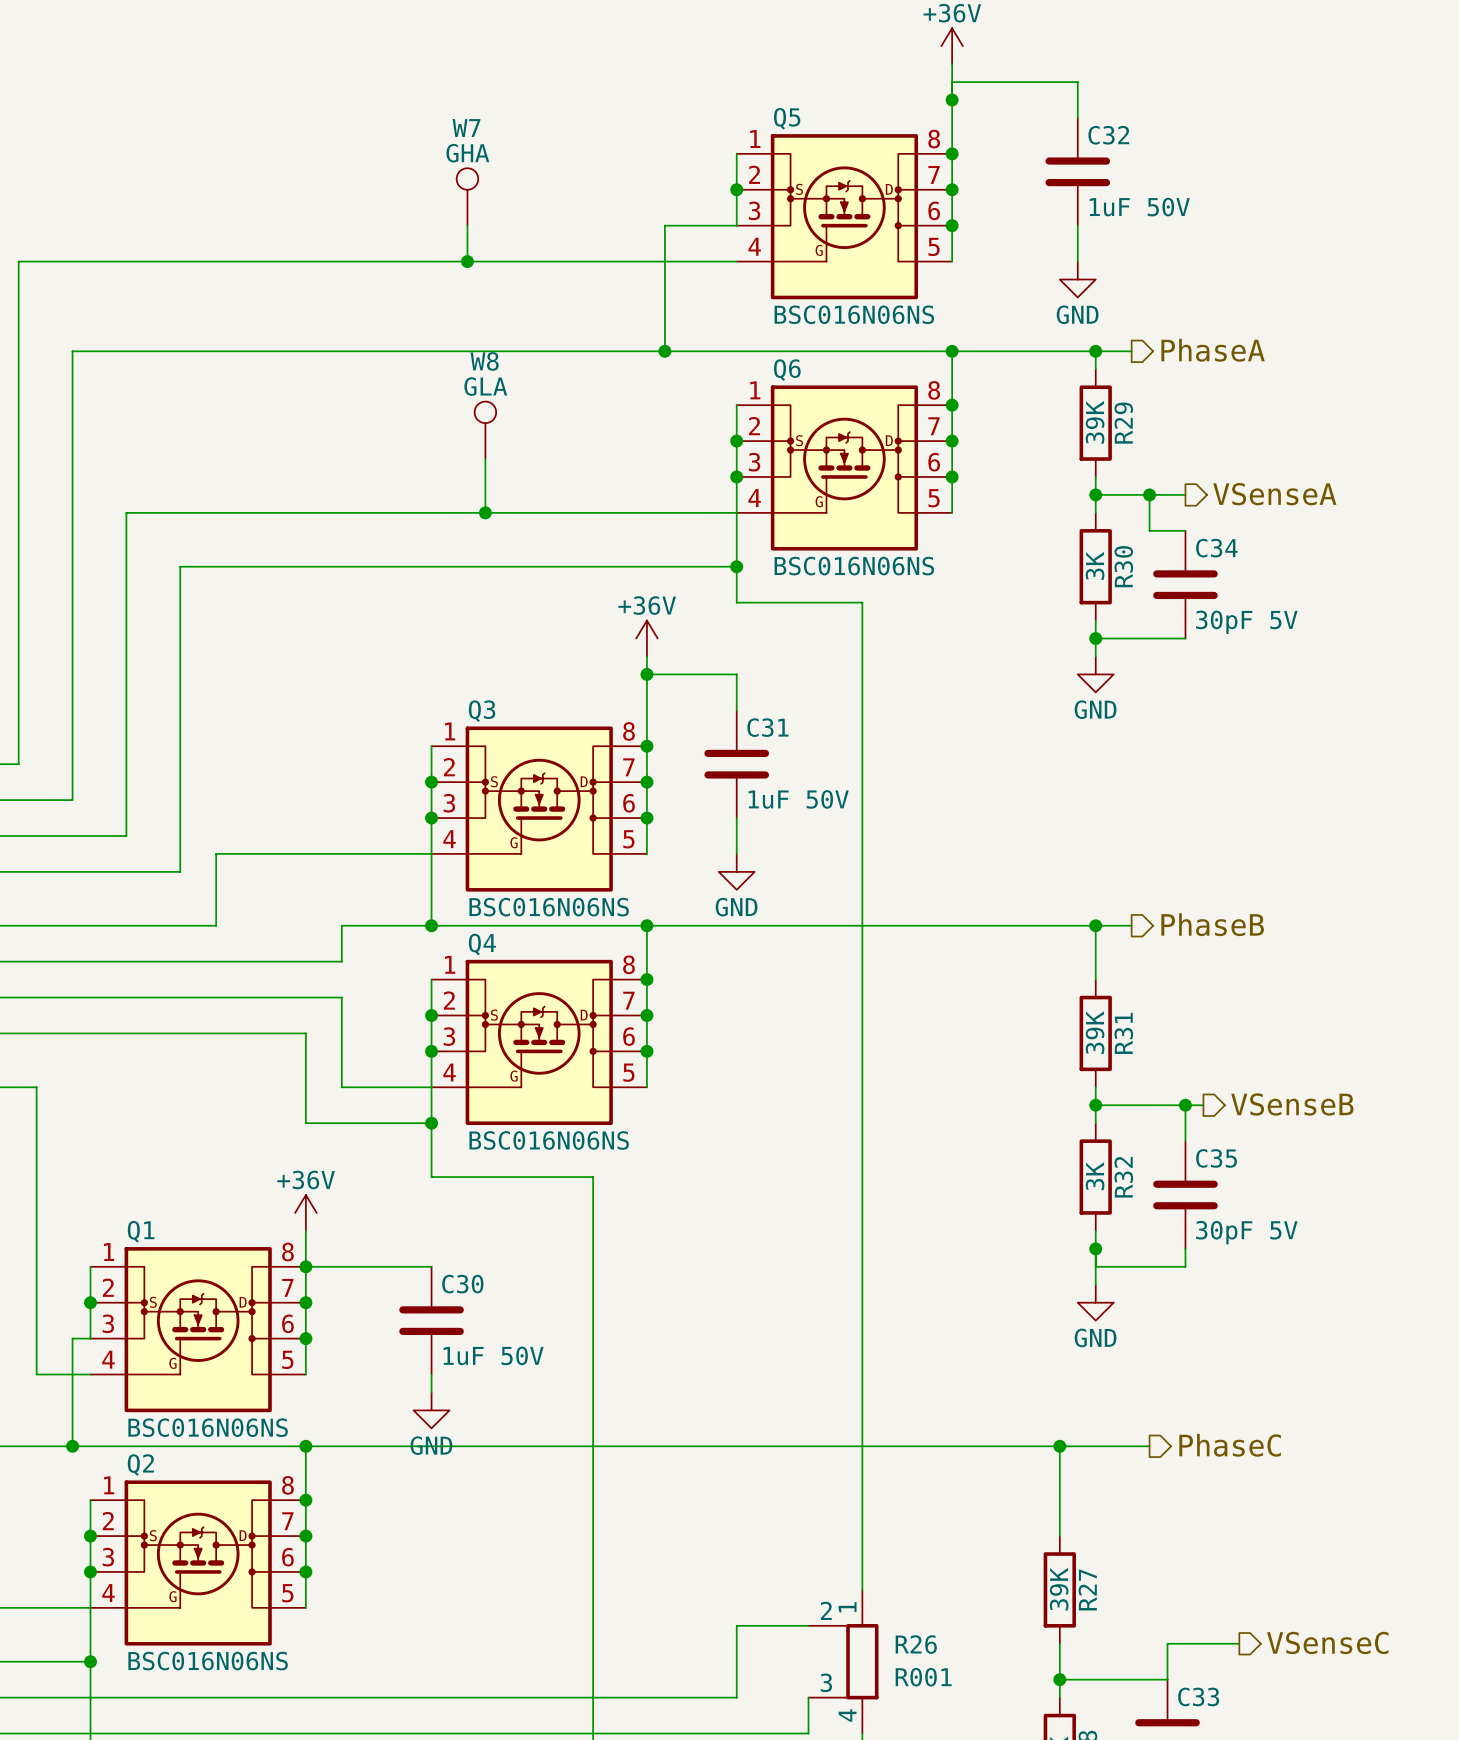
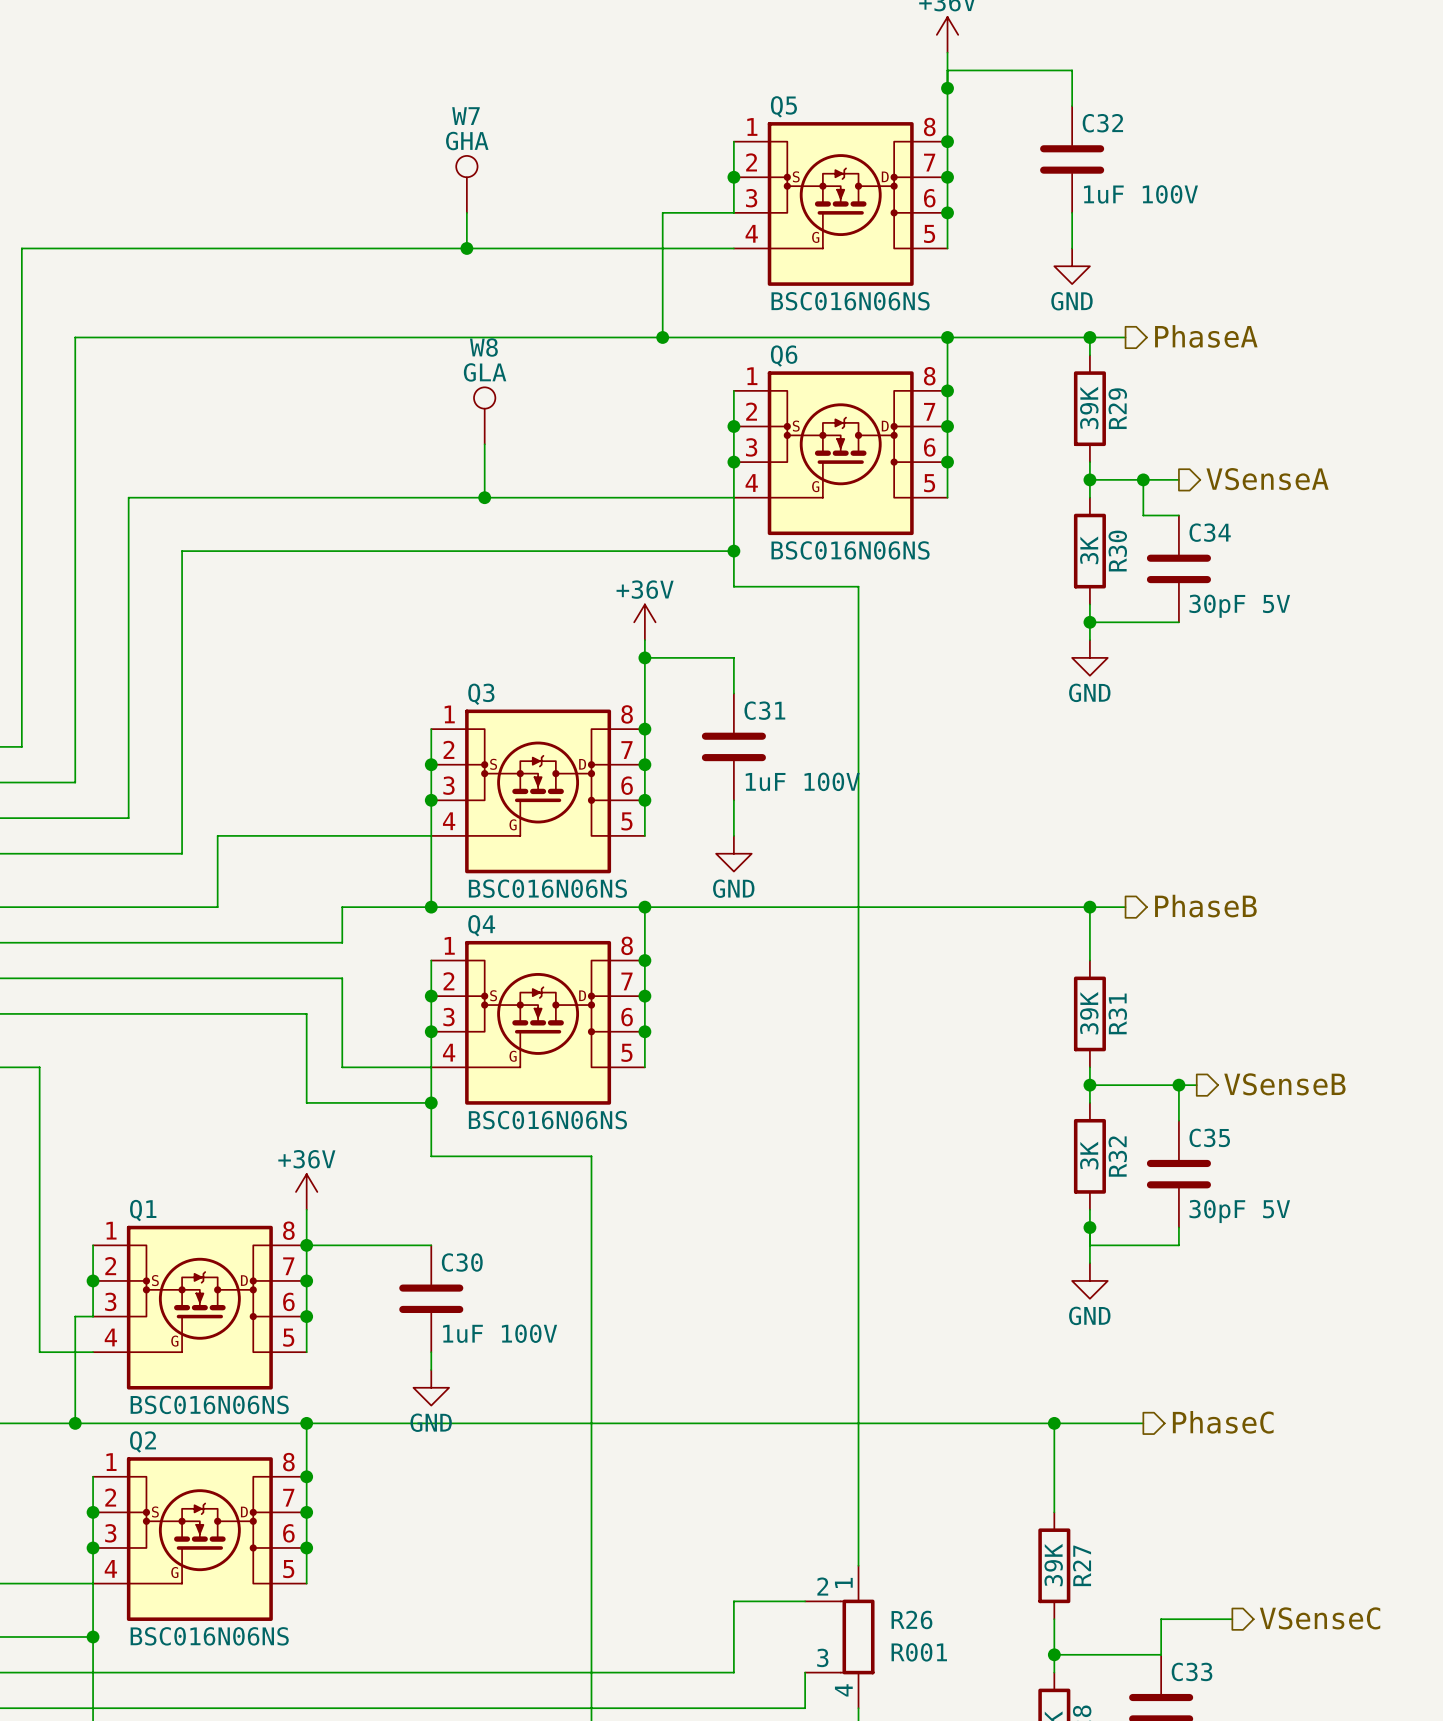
C32 value: 1uF 50V (1139, 207) -> 1uF 100V (1140, 194)
C31 value: 1uF 50V (798, 799) -> 1uF 100V (802, 781)
C30 value: 1uF 50V (493, 1355) -> 1uF 100V (500, 1333)

